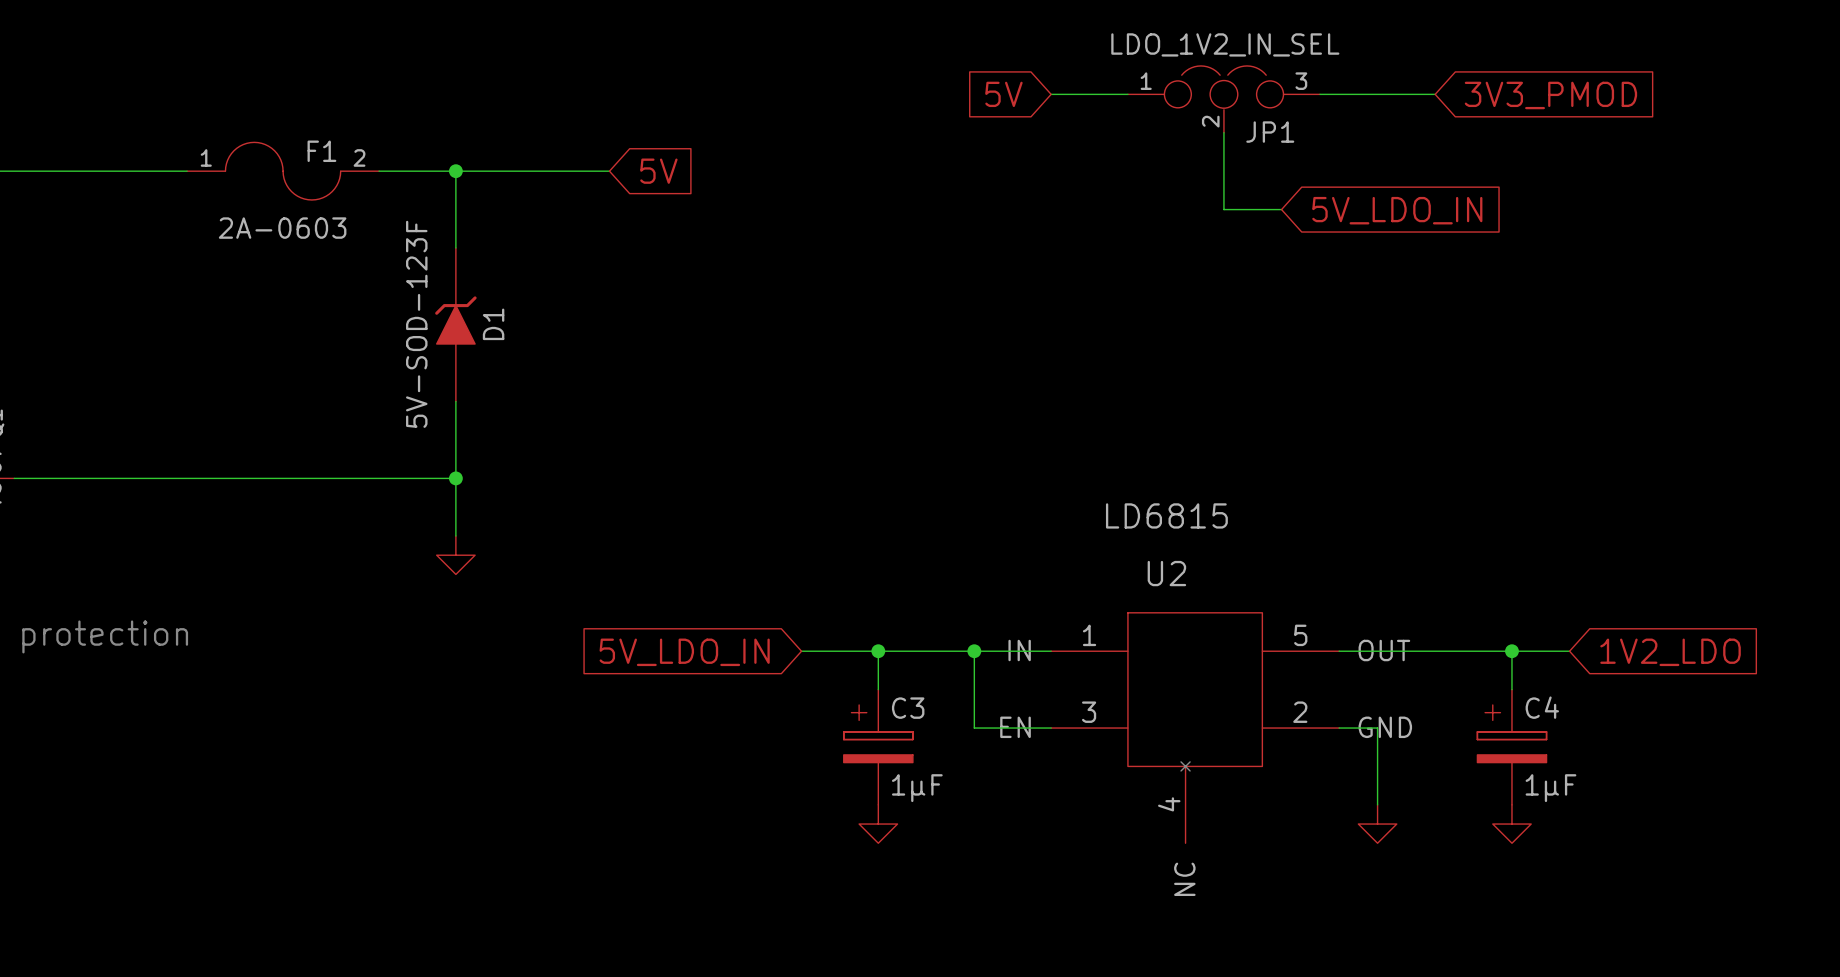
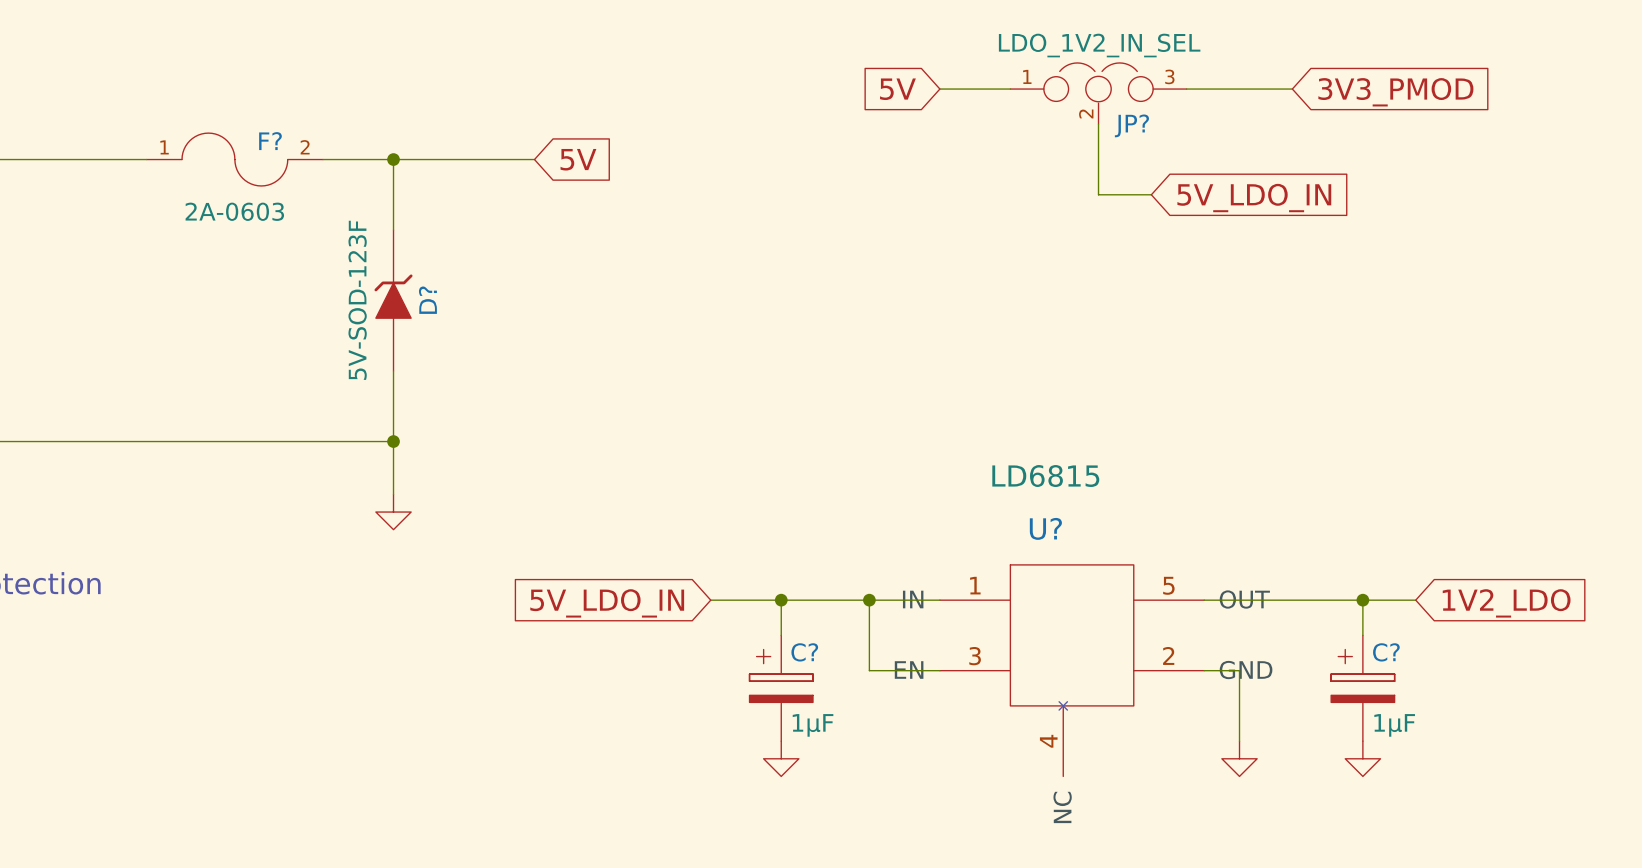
JP1 name: JP1 (1270, 132) -> JP? (1131, 125)
F1 name: F1 (321, 151) -> F? (270, 141)
D1 name: D1 (493, 324) -> D? (427, 300)
U2 name: U2 (1166, 573) -> U? (1045, 528)
C4 name: C4 (1542, 707) -> C? (1386, 652)
C3 name: C3 (908, 708) -> C? (804, 652)

